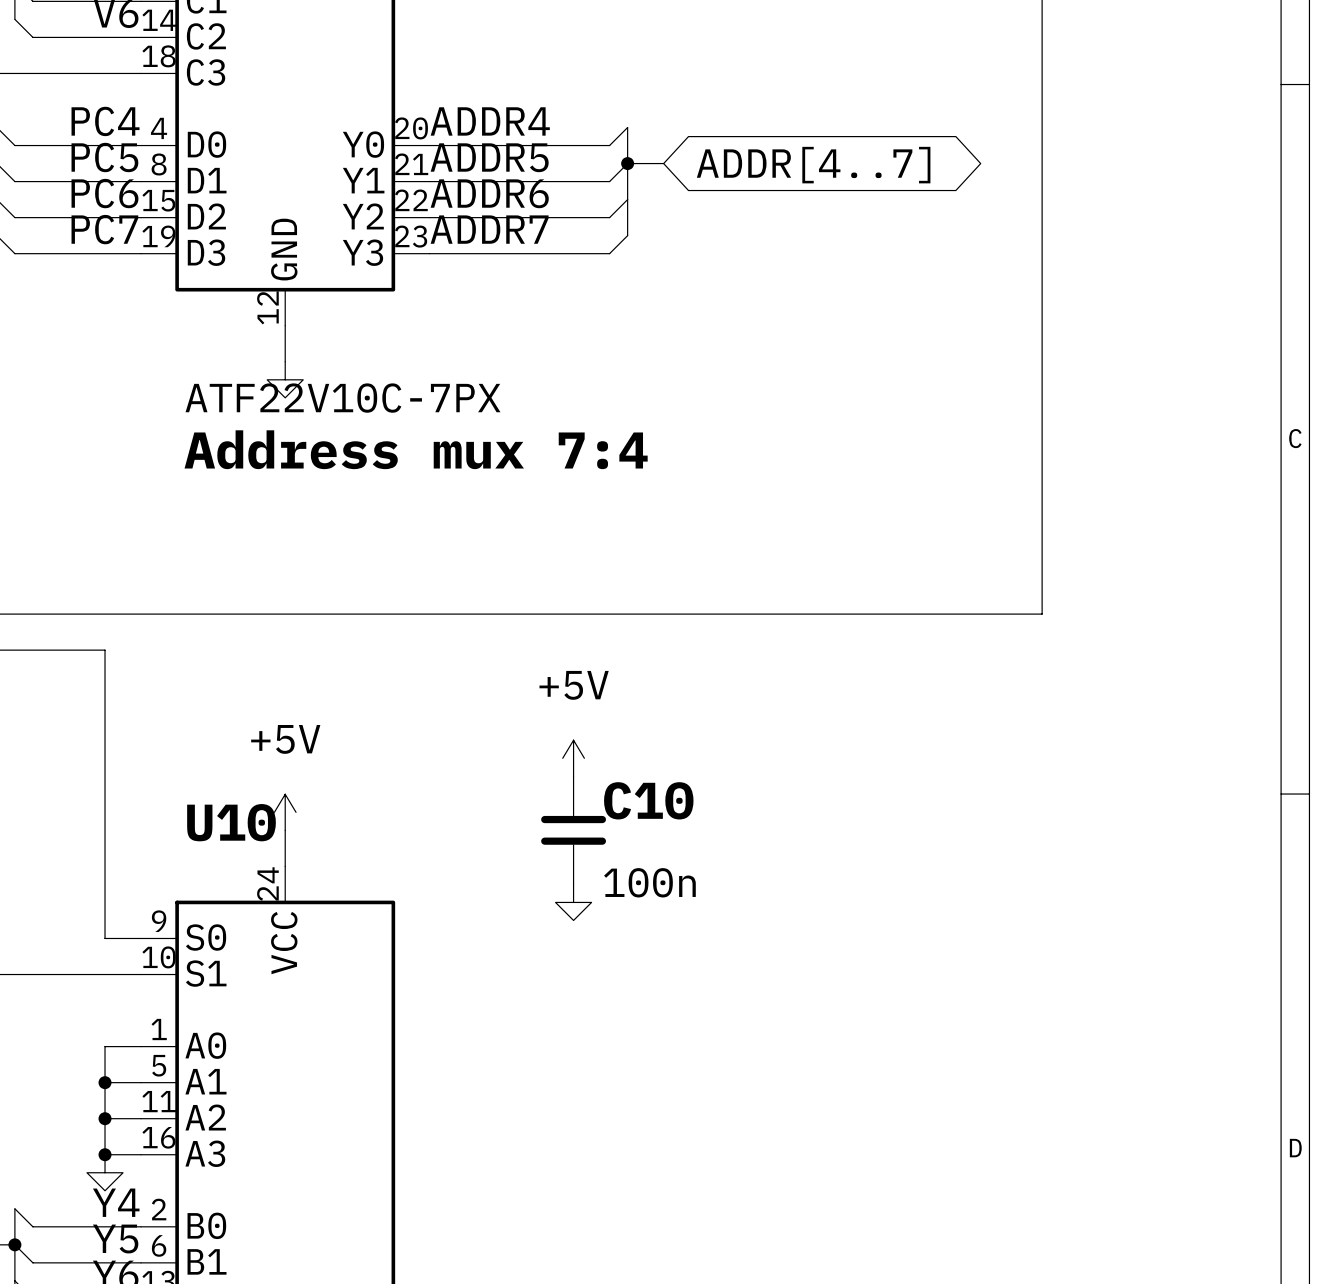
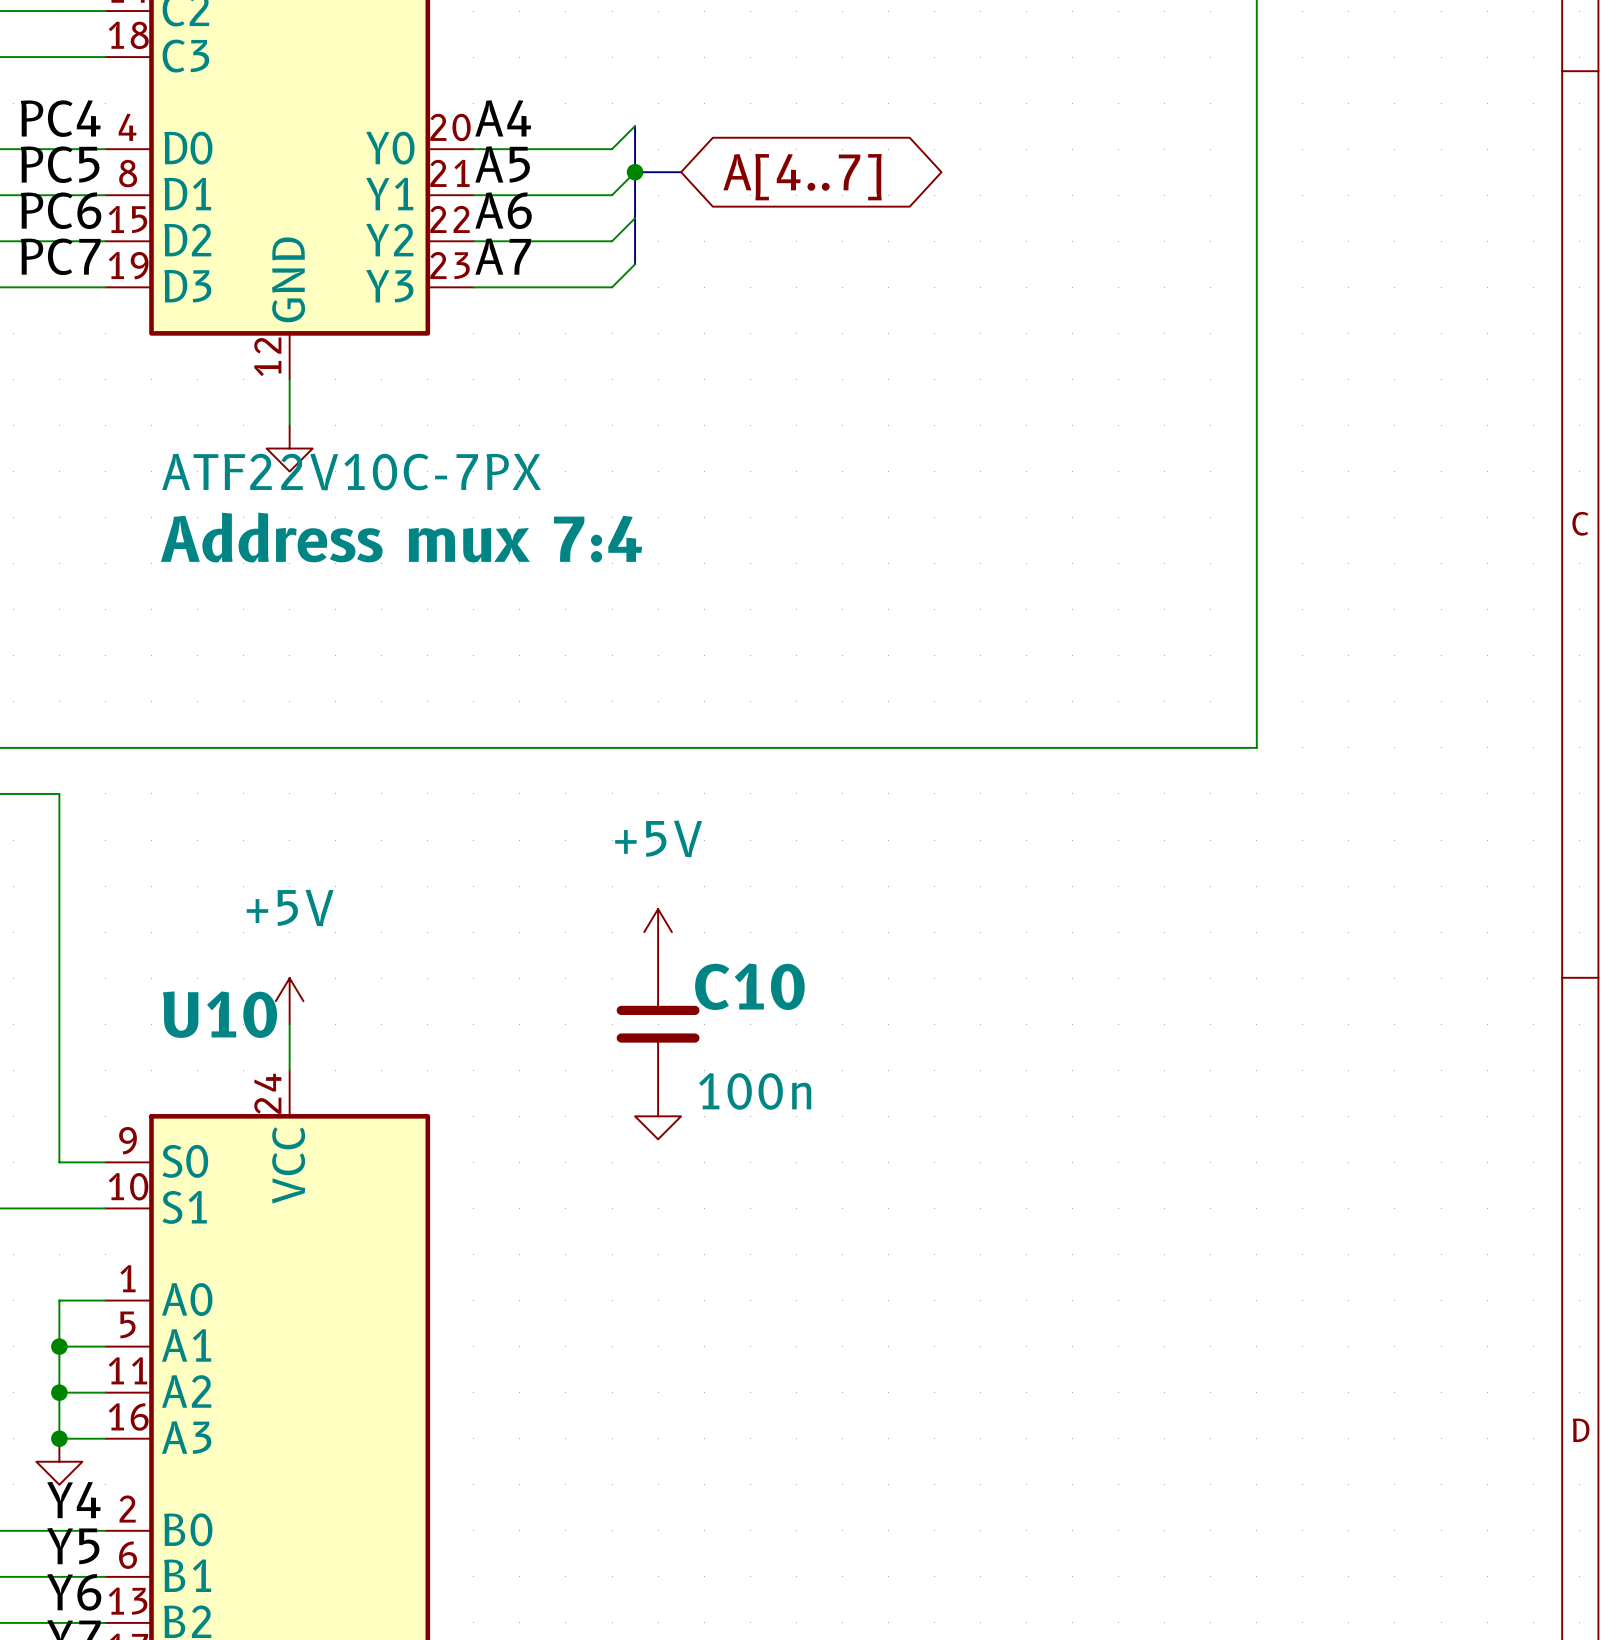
label: ADDR4 (490, 121) -> A4 (503, 118)
wire: (627, 127) (609, 145) (537, 145) -> (635, 126) (612, 149)
bus: (627, 127) (627, 235) -> (635, 126) (635, 264)
label: ADDR5 (489, 157) -> A5 (502, 164)
wire: (627, 163) (609, 181) (537, 181) -> (635, 172) (612, 195)
bus: (627, 163) (663, 163) -> (635, 172) (681, 172)
junction position: (627, 163) -> (635, 172)
global label: ADDR[4..7] (813, 165) -> A[4..7] (802, 177)
label: ADDR6 (489, 193) -> A6 (503, 210)
wire: (627, 199) (609, 217) (537, 217) -> (635, 218) (612, 241)
label: ADDR7 (489, 229) -> A7 (503, 256)
wire: (627, 235) (609, 253) (537, 253) -> (635, 264) (612, 287)

